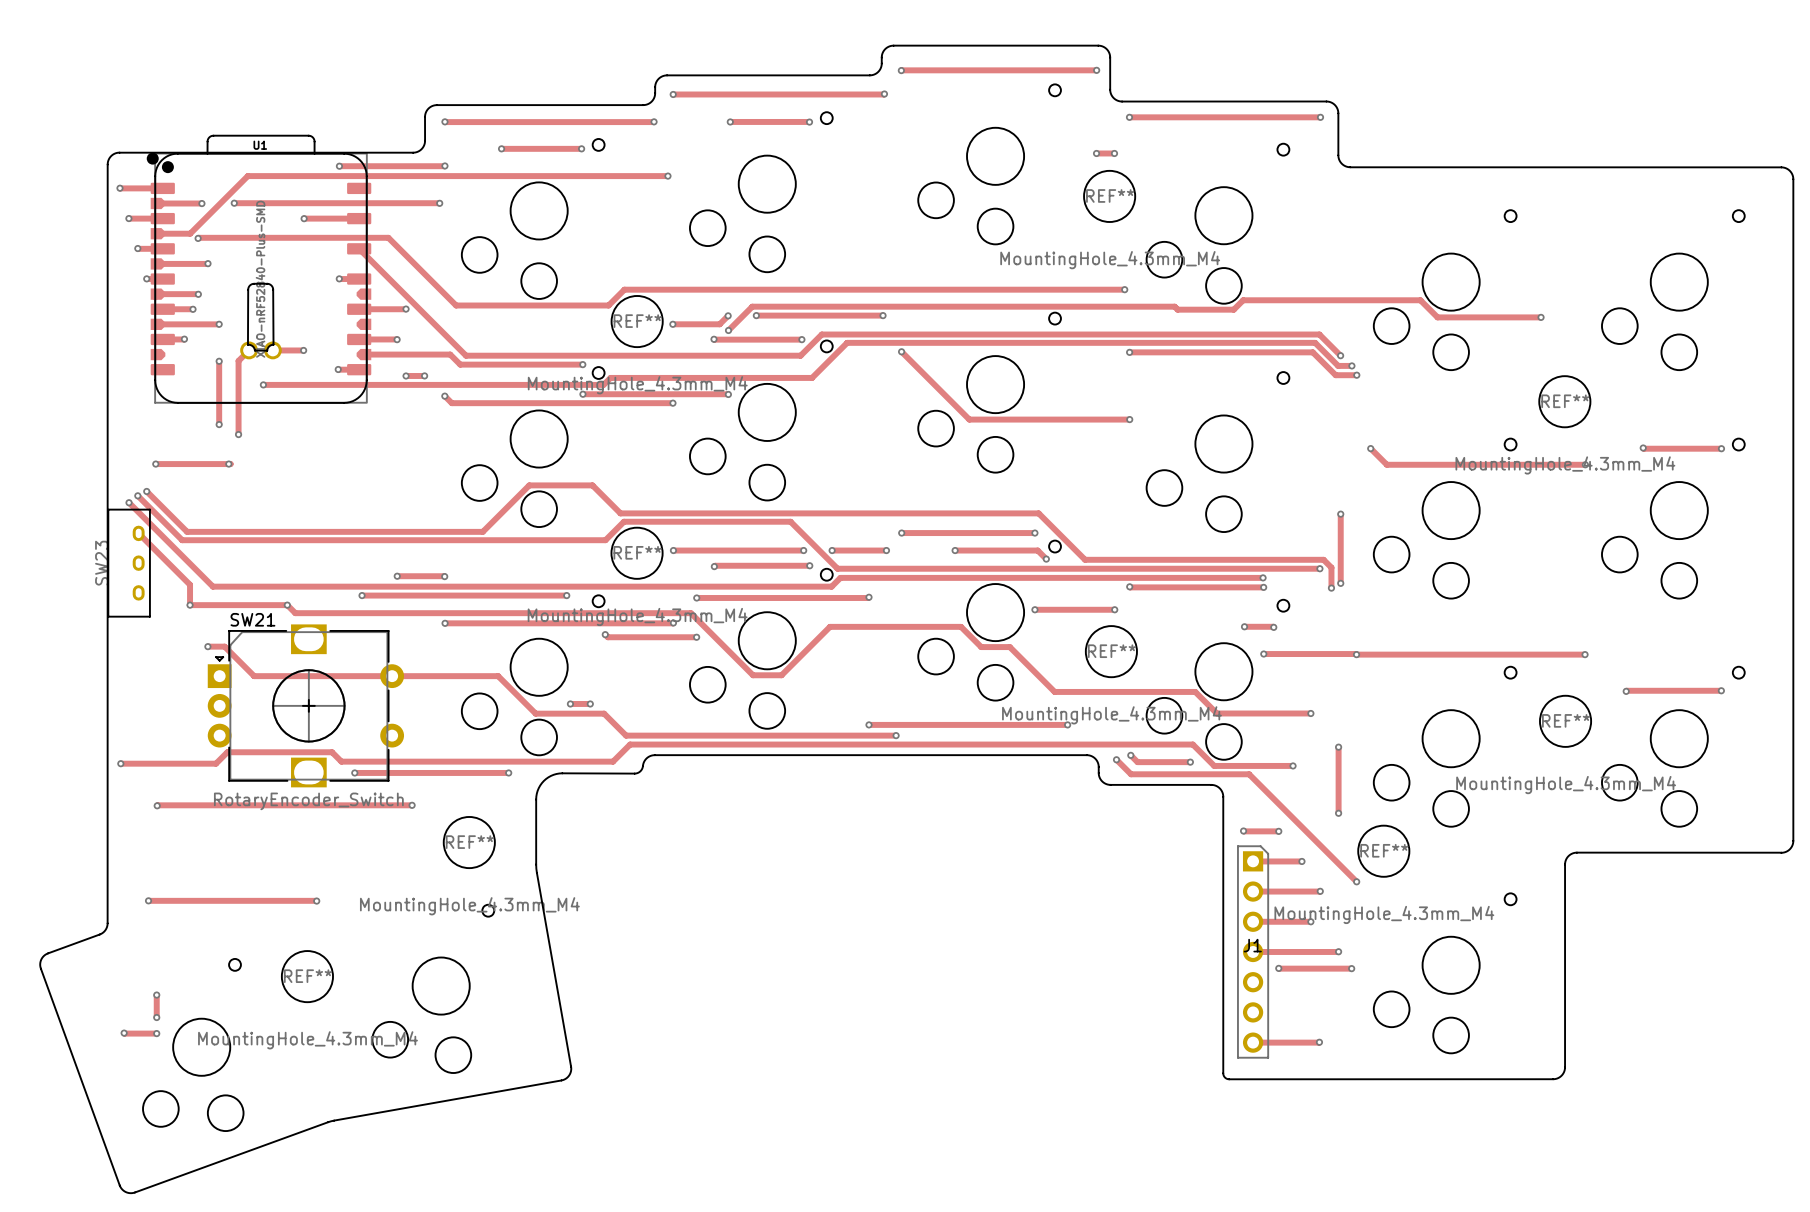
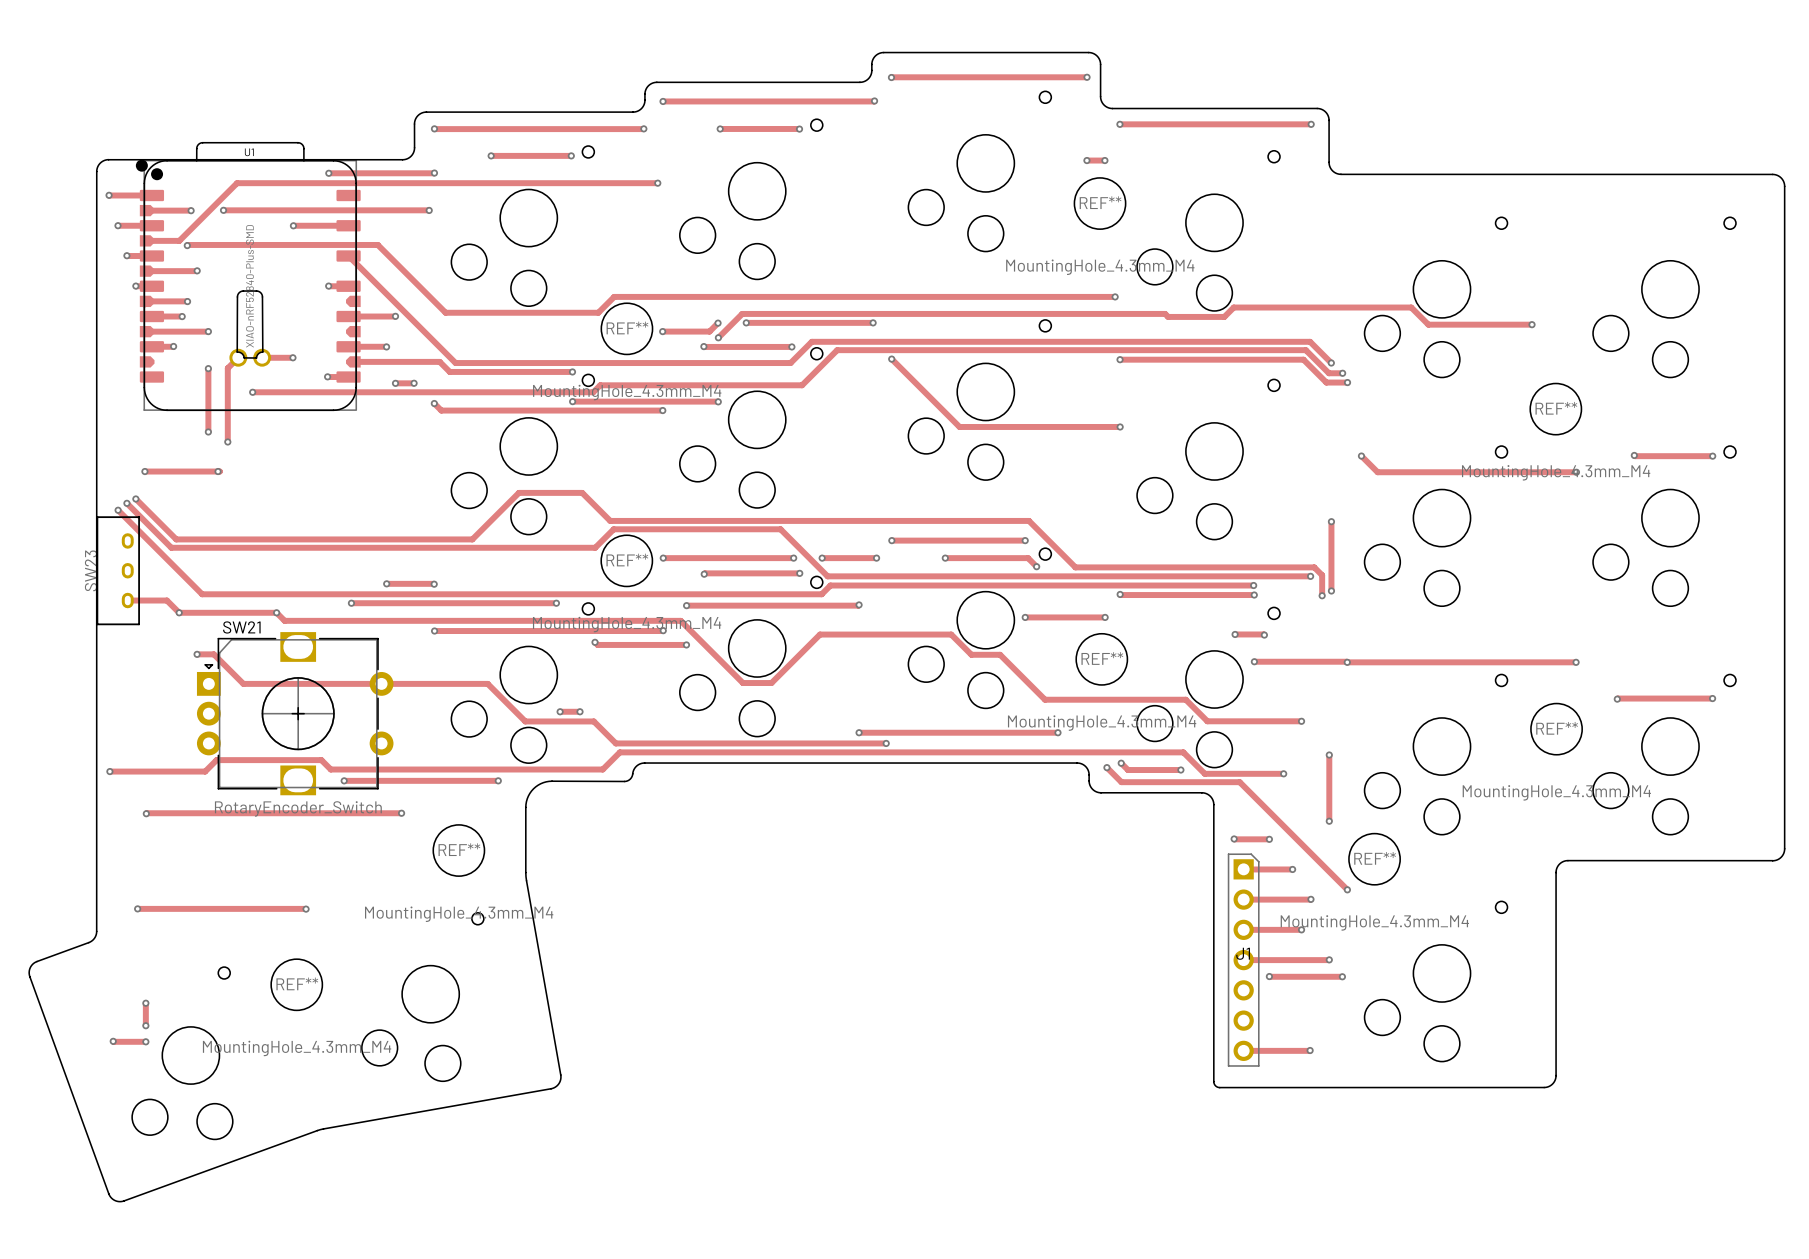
track: (138, 533) (190, 584) (190, 605) -> (127, 600) (166, 600) (179, 612)

